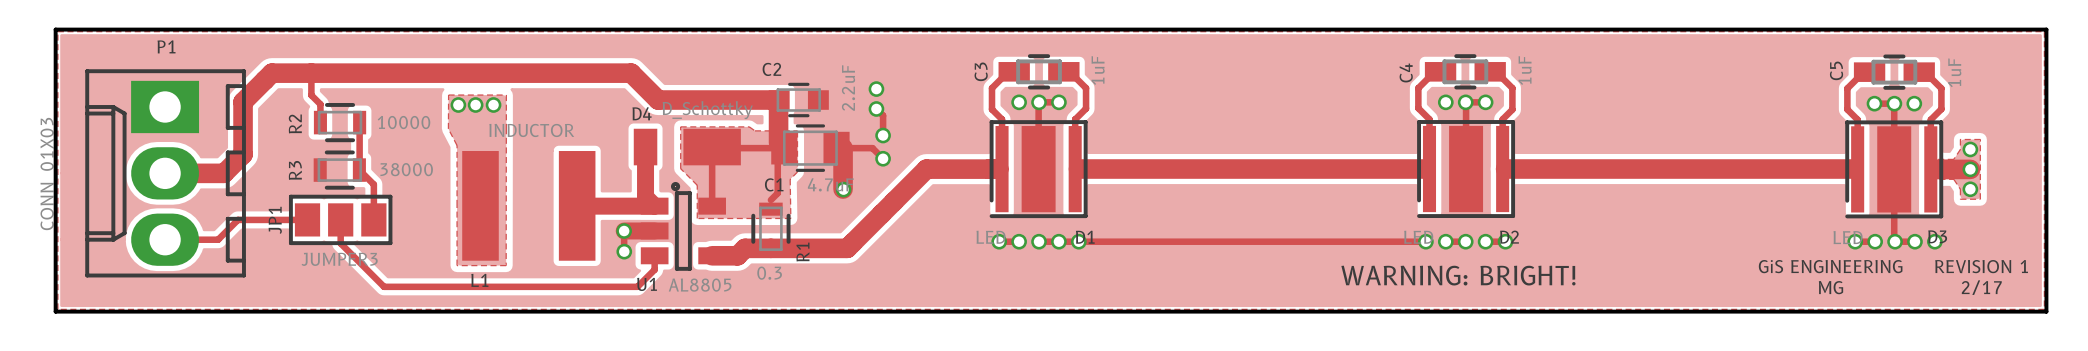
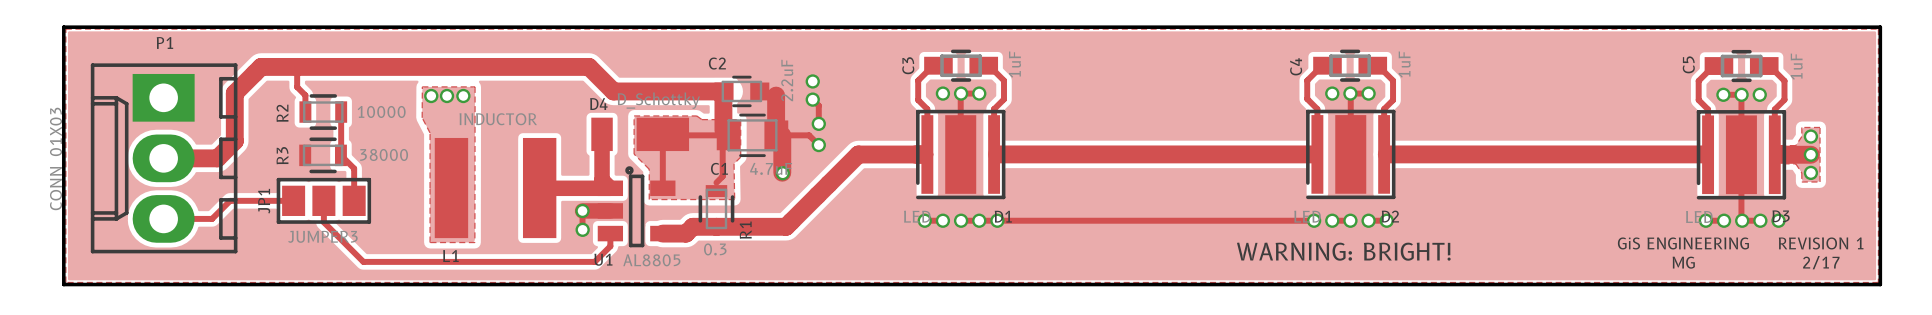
track: none -> (776, 95) (776, 126)

